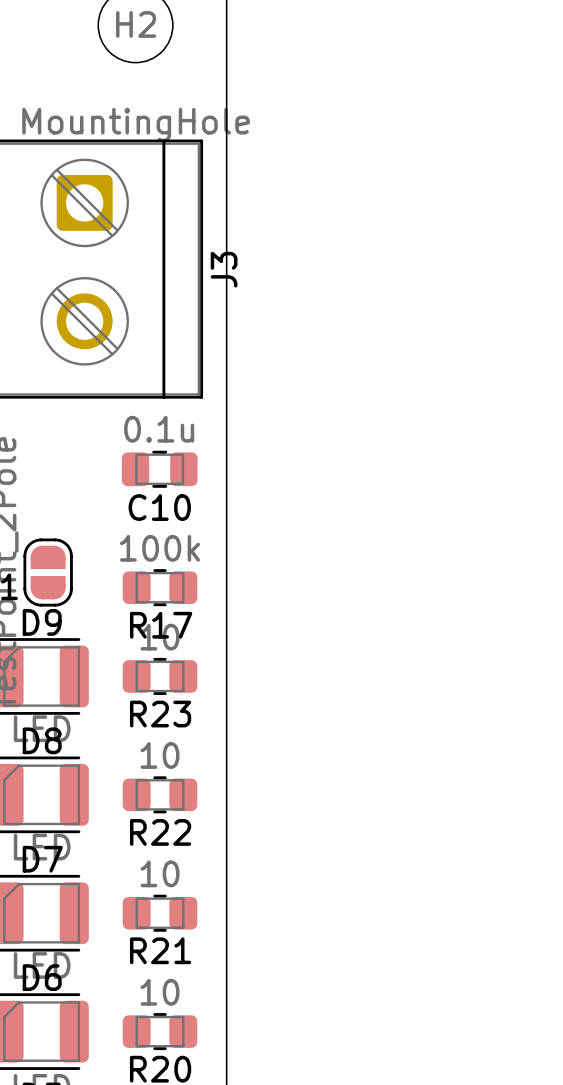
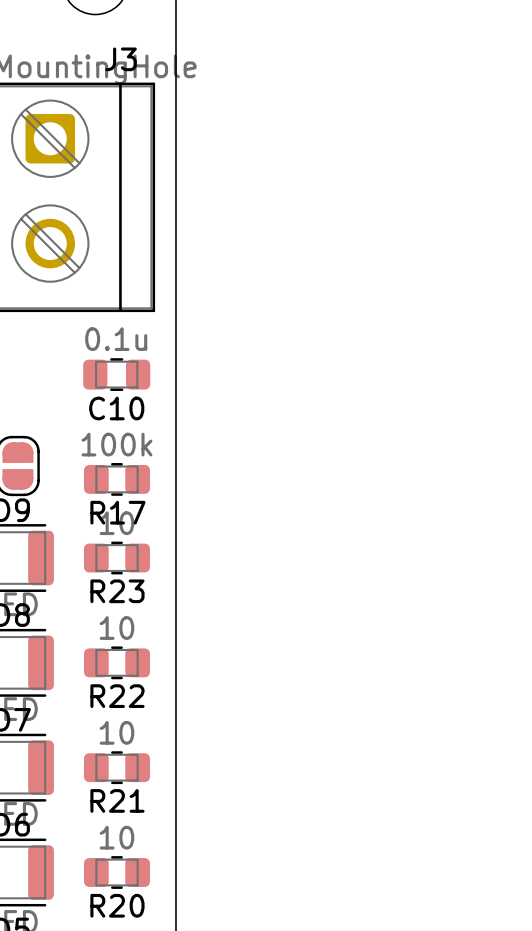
J3 name rotation: 0° (224, 269) -> 90° clockwise (121, 59)
J3 name position: J3 (224, 269) -> J3 (121, 59)

